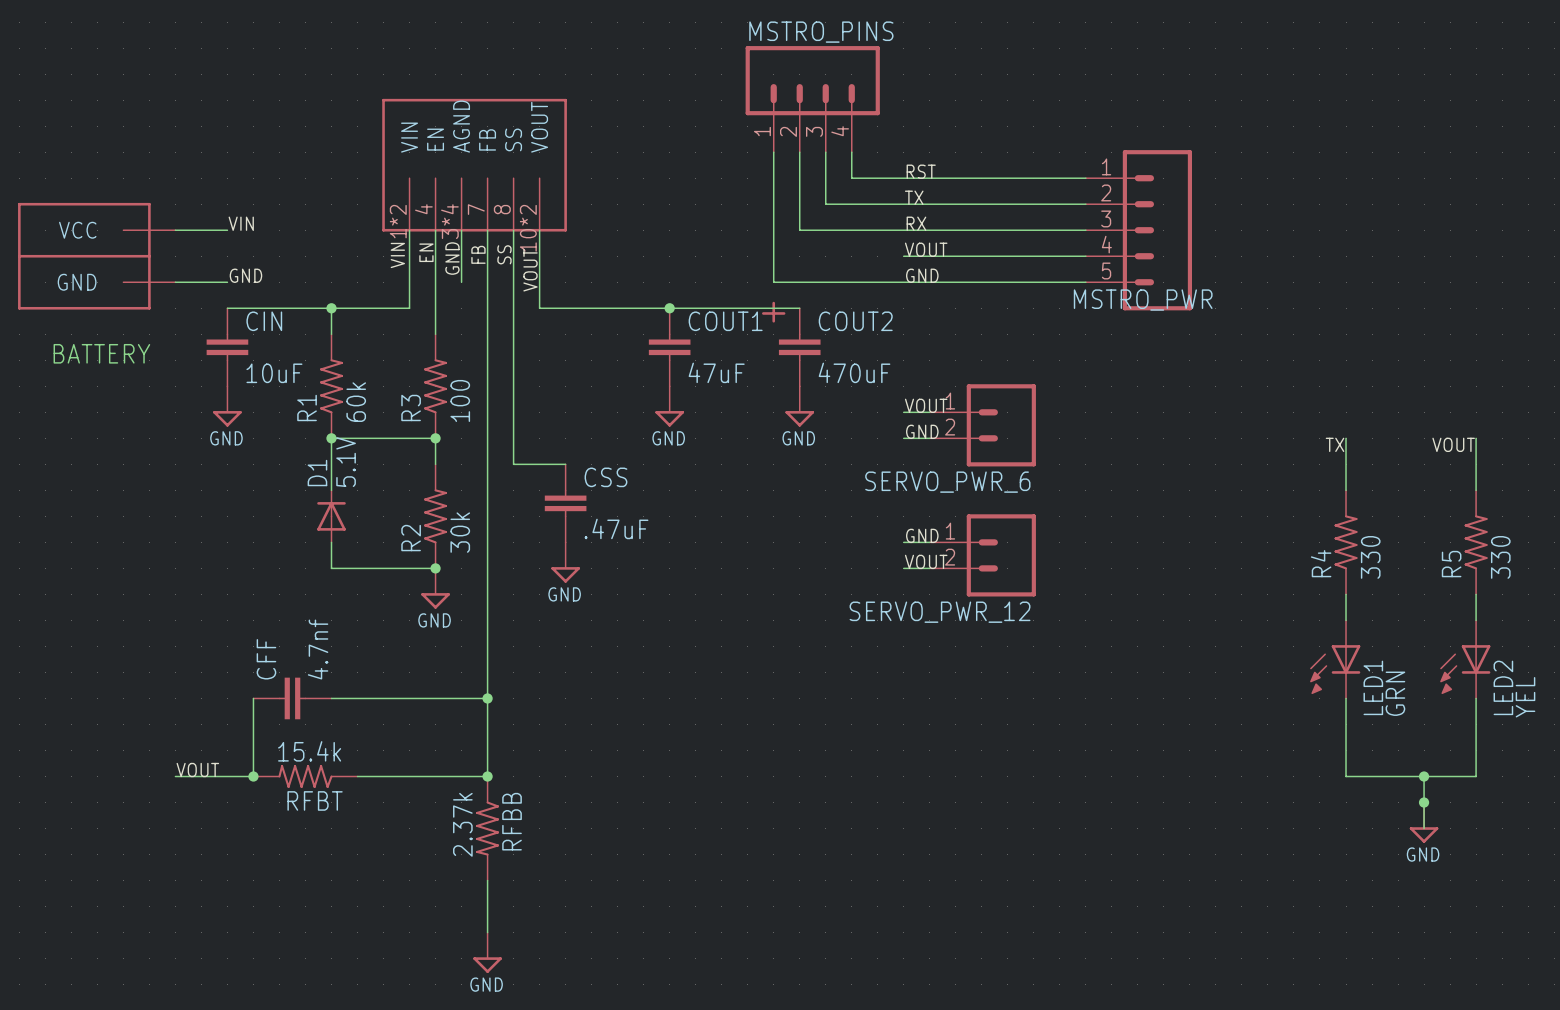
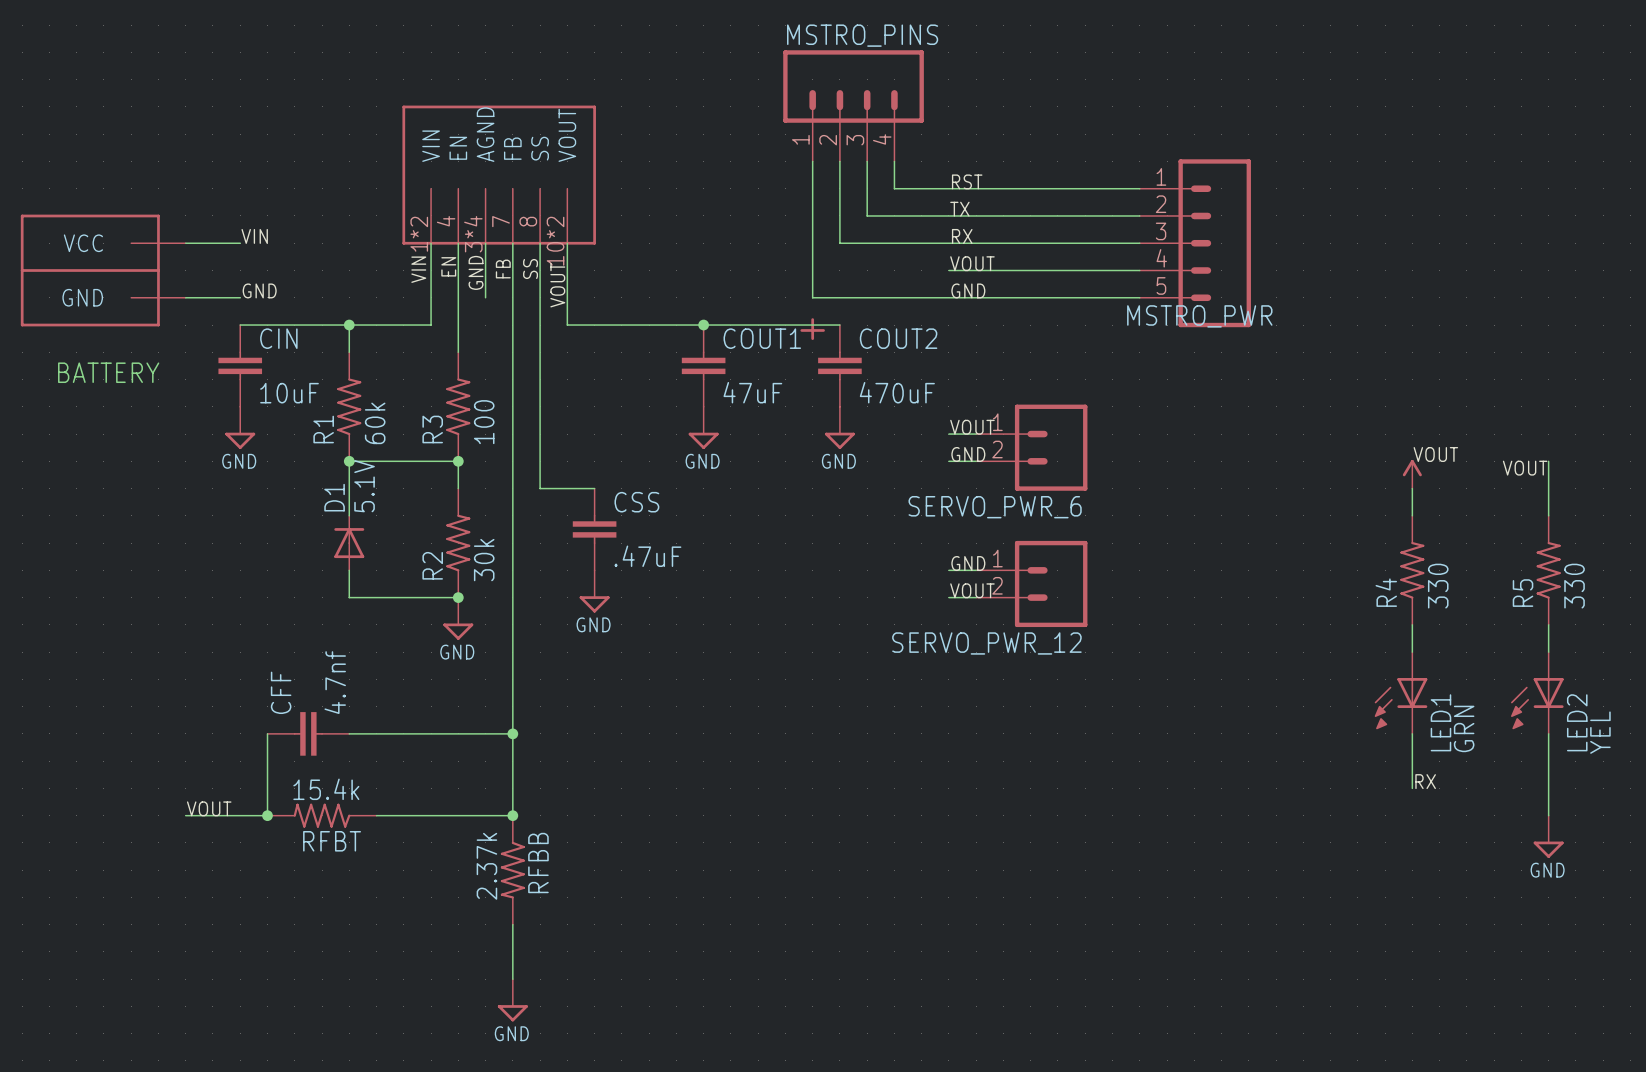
label: TX (1335, 444) -> VOUT (1435, 454)
power symbol: none -> (1412, 474)
label: none -> RX (1425, 781)
wire: (1346, 750) (1346, 776) (1476, 776) -> none
wire: (1424, 776) (1424, 828) -> none
junction: (1424, 776) -> none
junction: (1424, 802) -> none
power symbol position: GND (1424, 822) -> GND (1548, 836)

